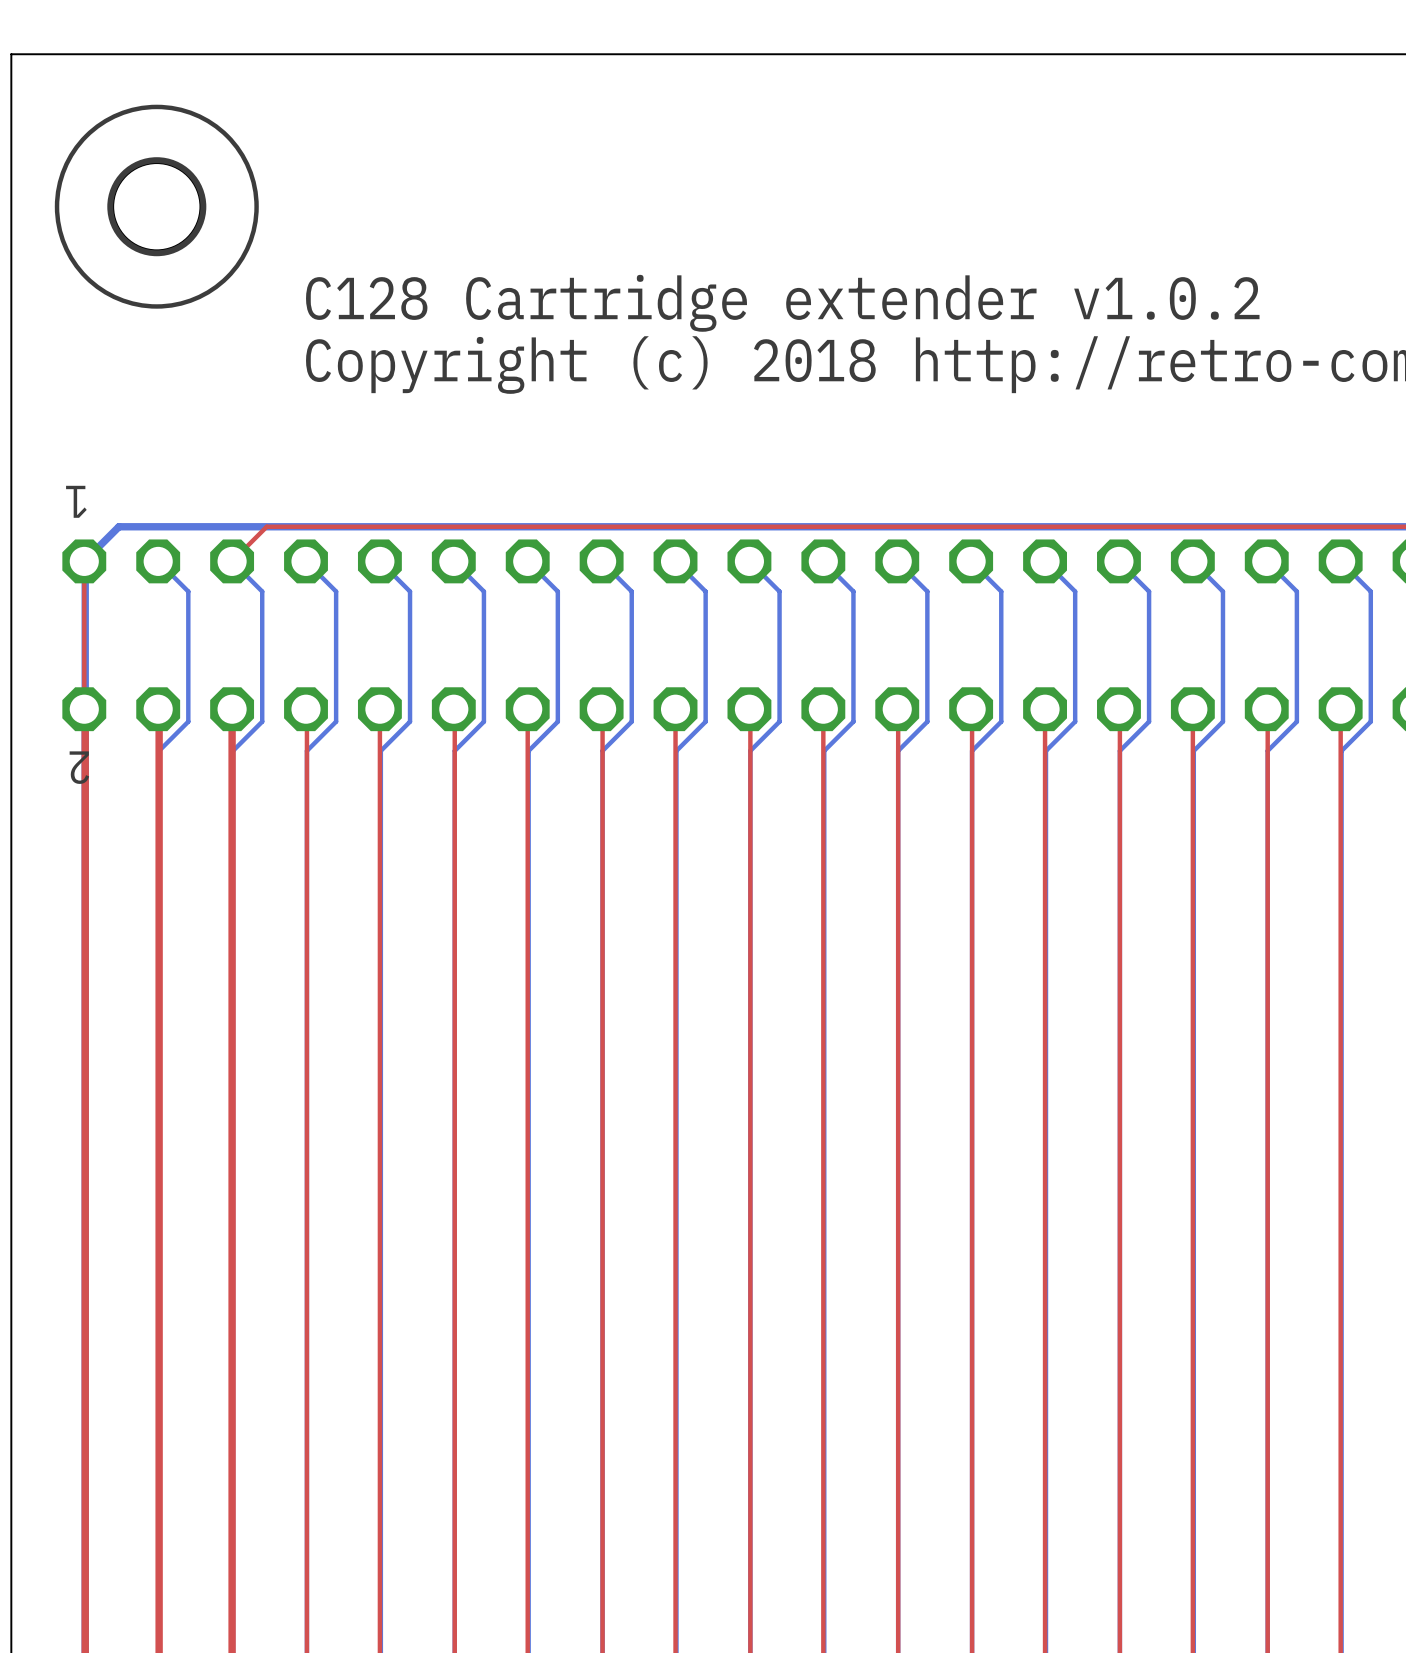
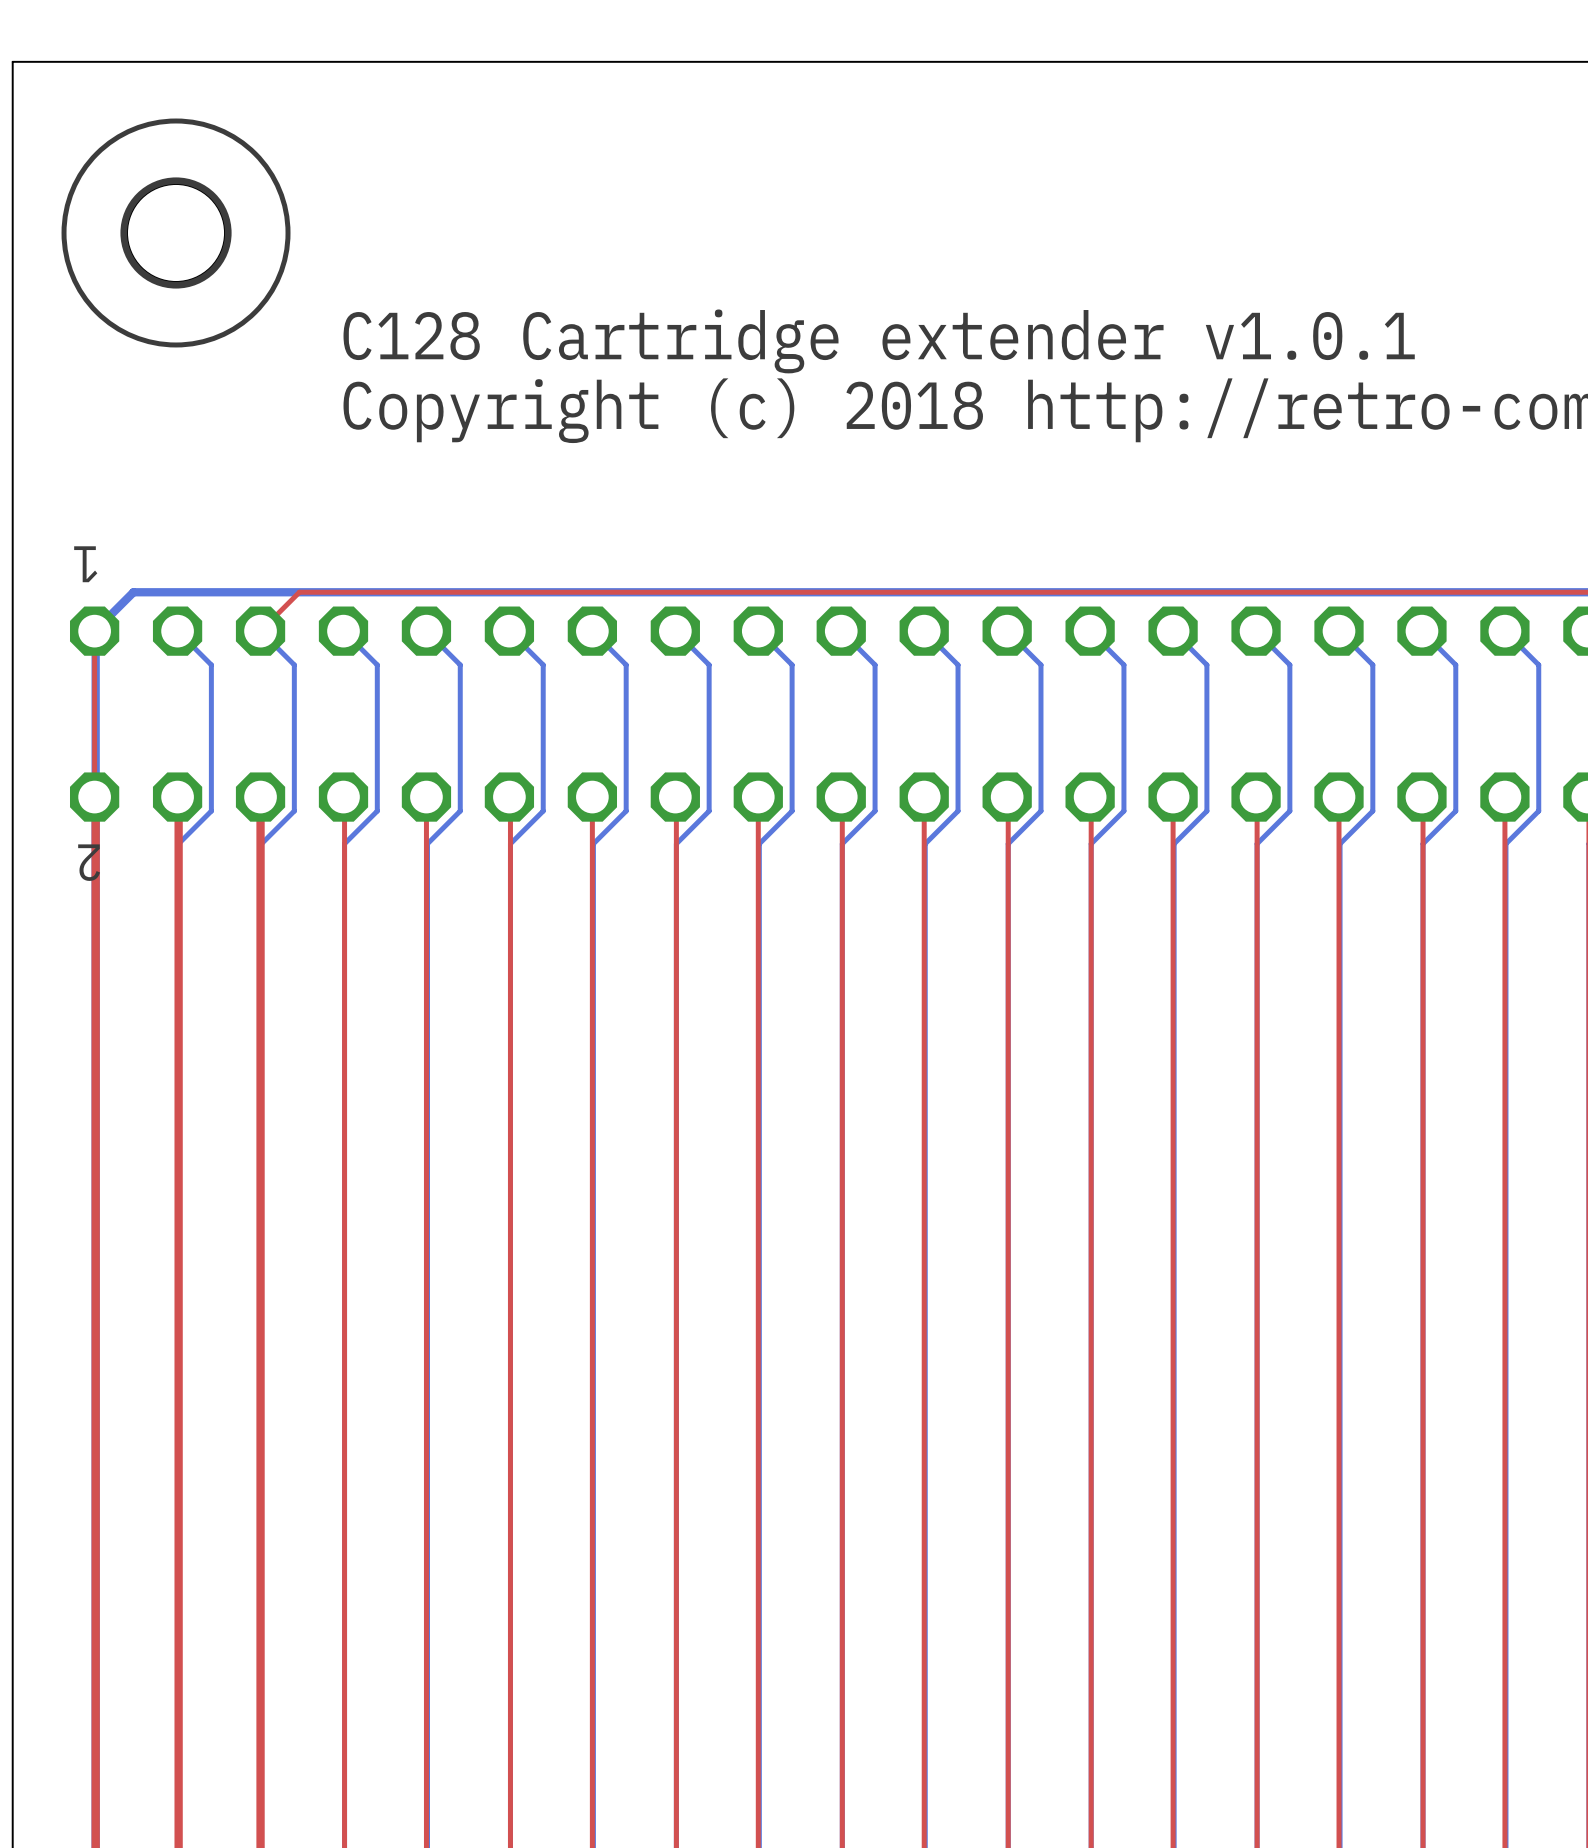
text: C128 Cartridge extender v1.0.2 (782, 303) -> C128 Cartridge extender v1.0.1 (879, 341)

